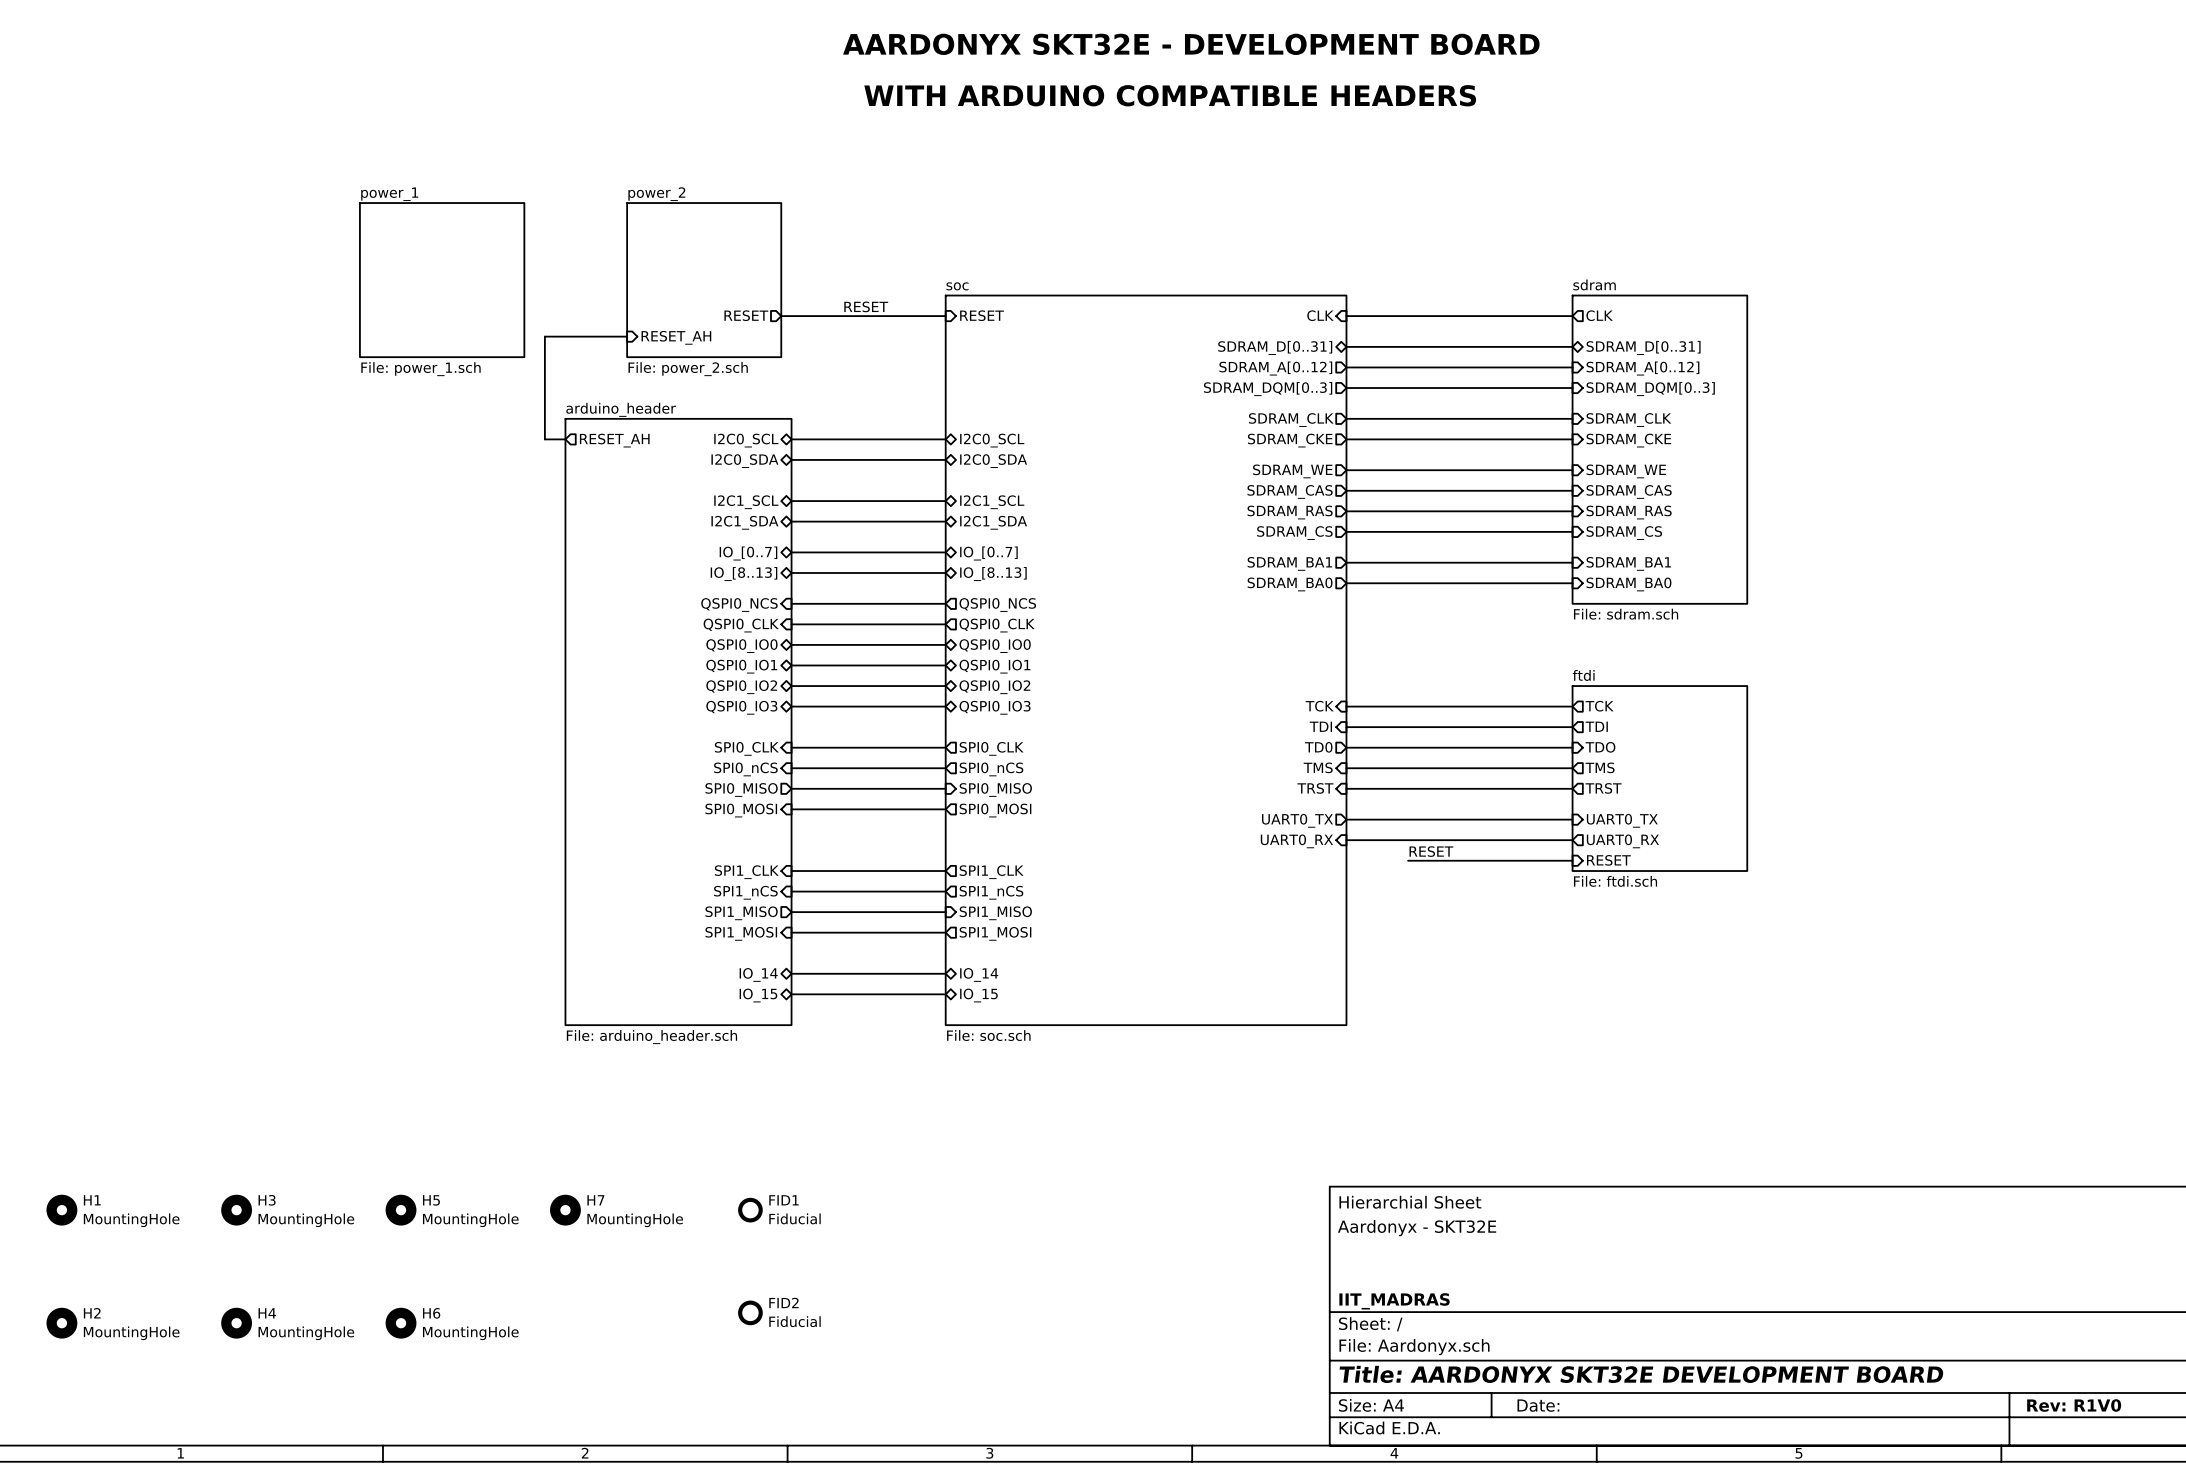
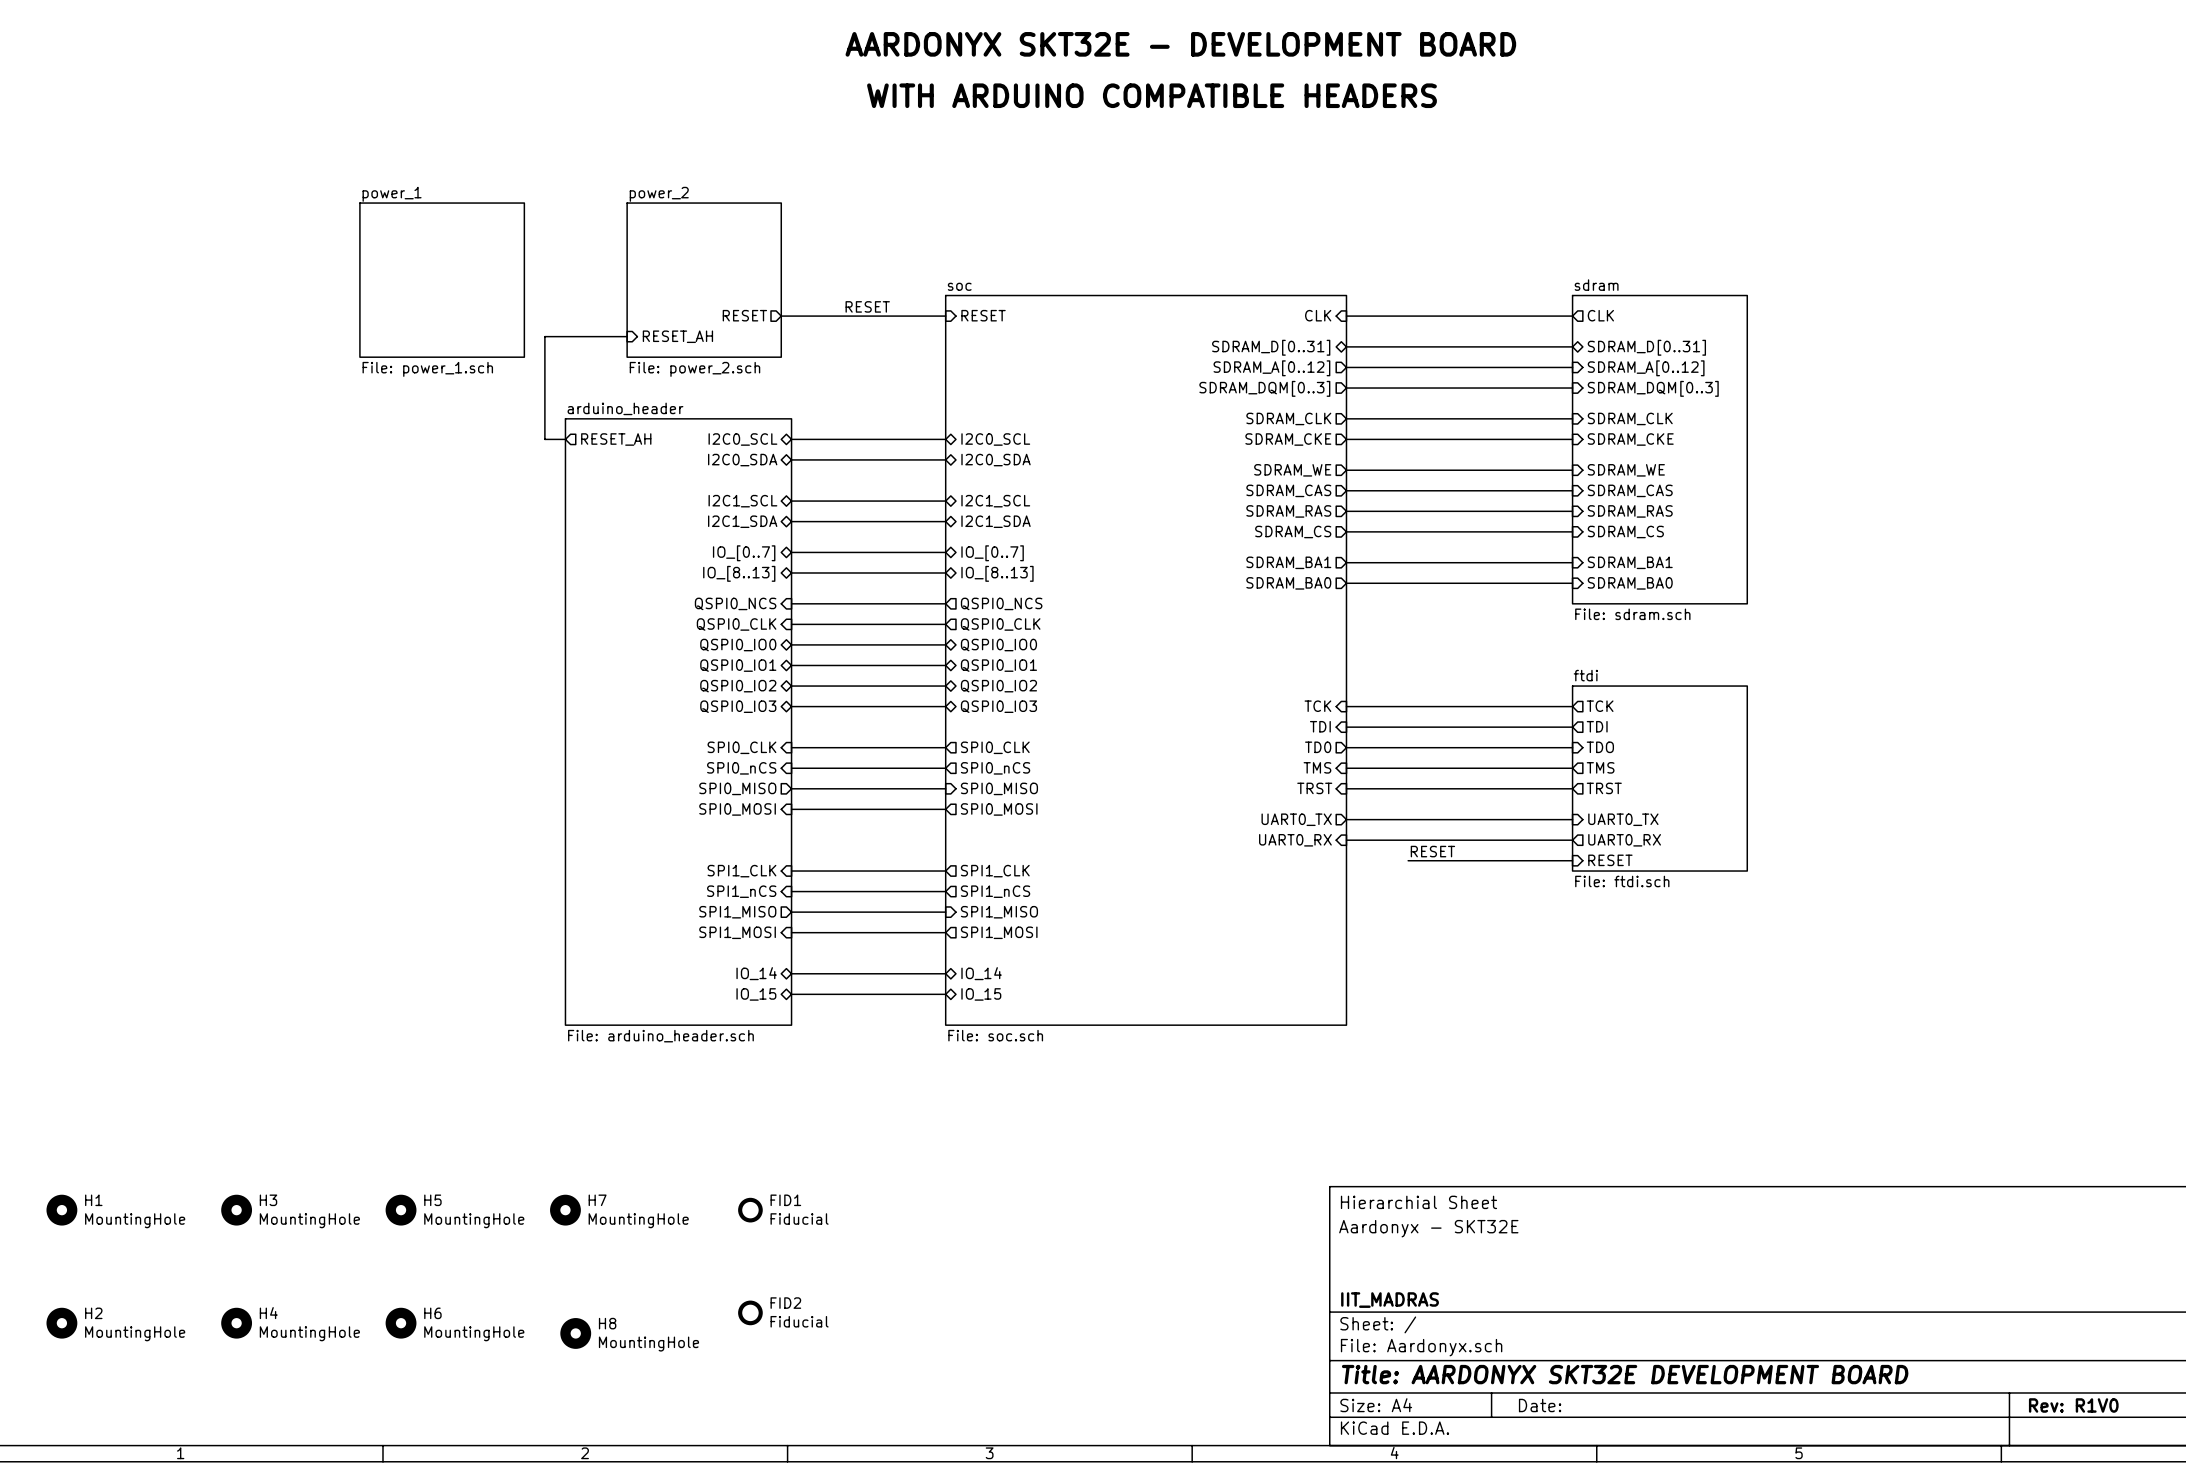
H8: none -> MountingHole (575, 1333)

